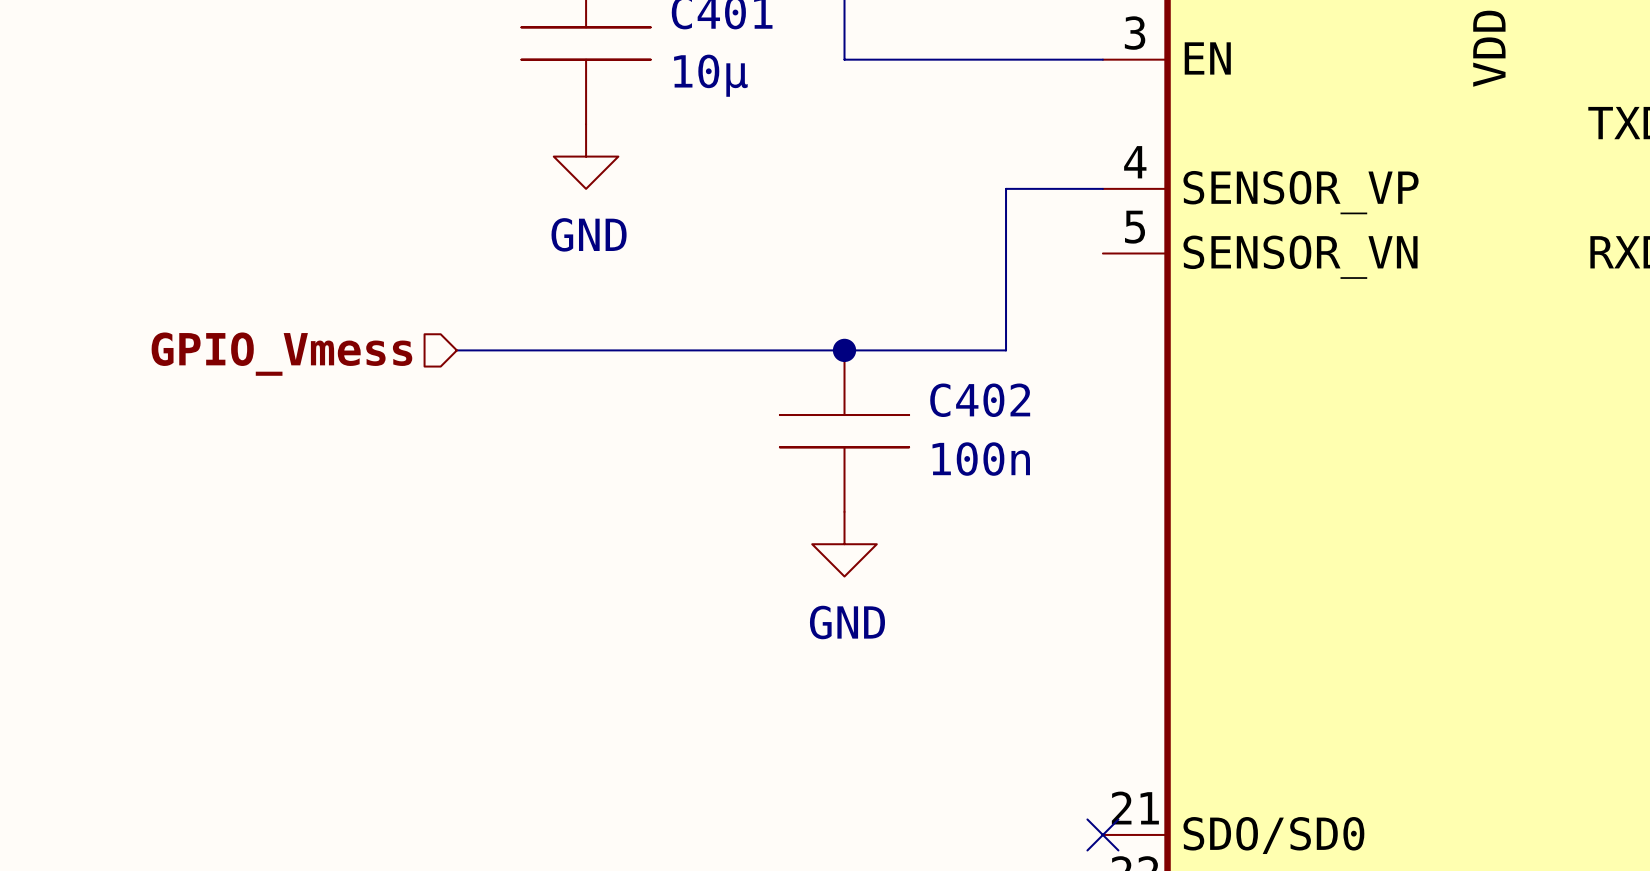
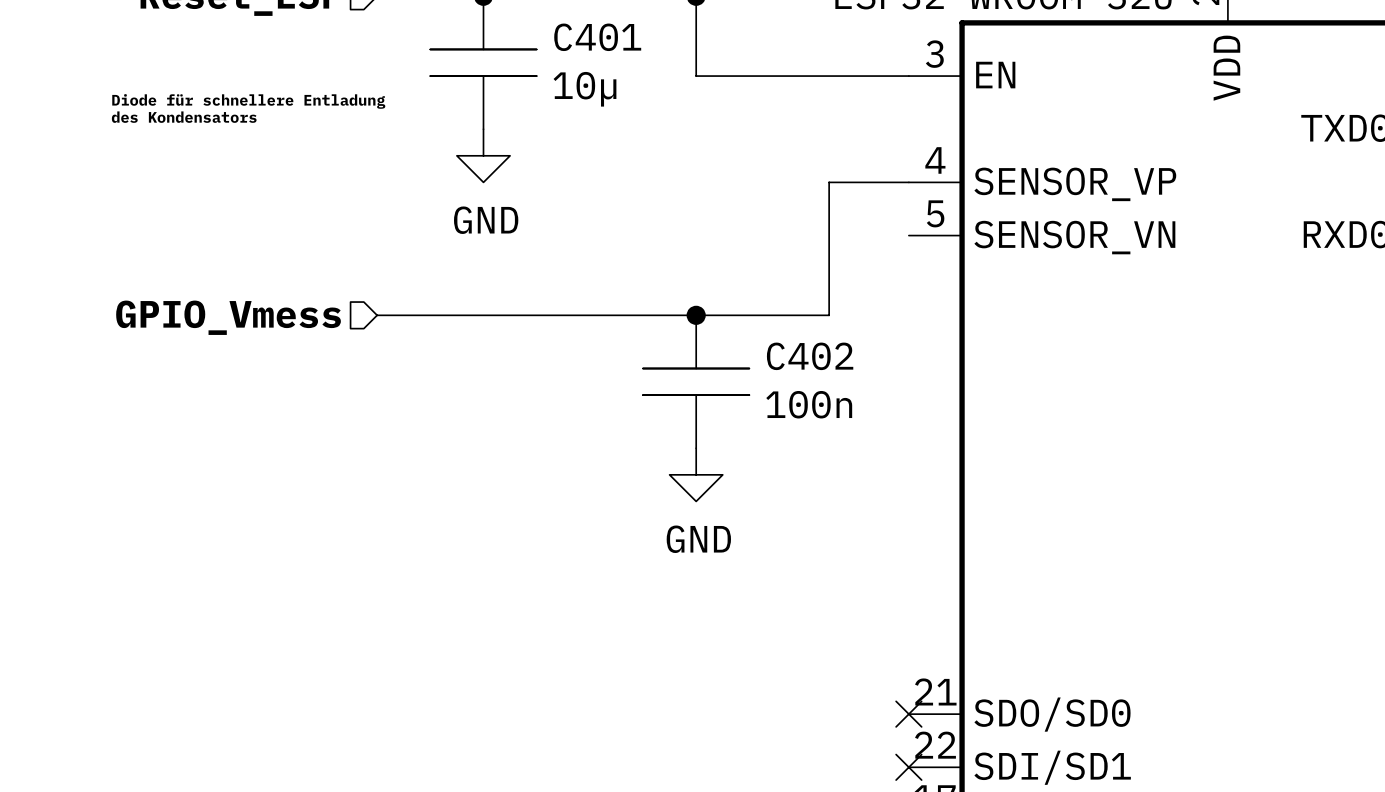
text: none -> Diode für schnellere Entladung (248, 101)
text: none -> des Kondensators (184, 117)

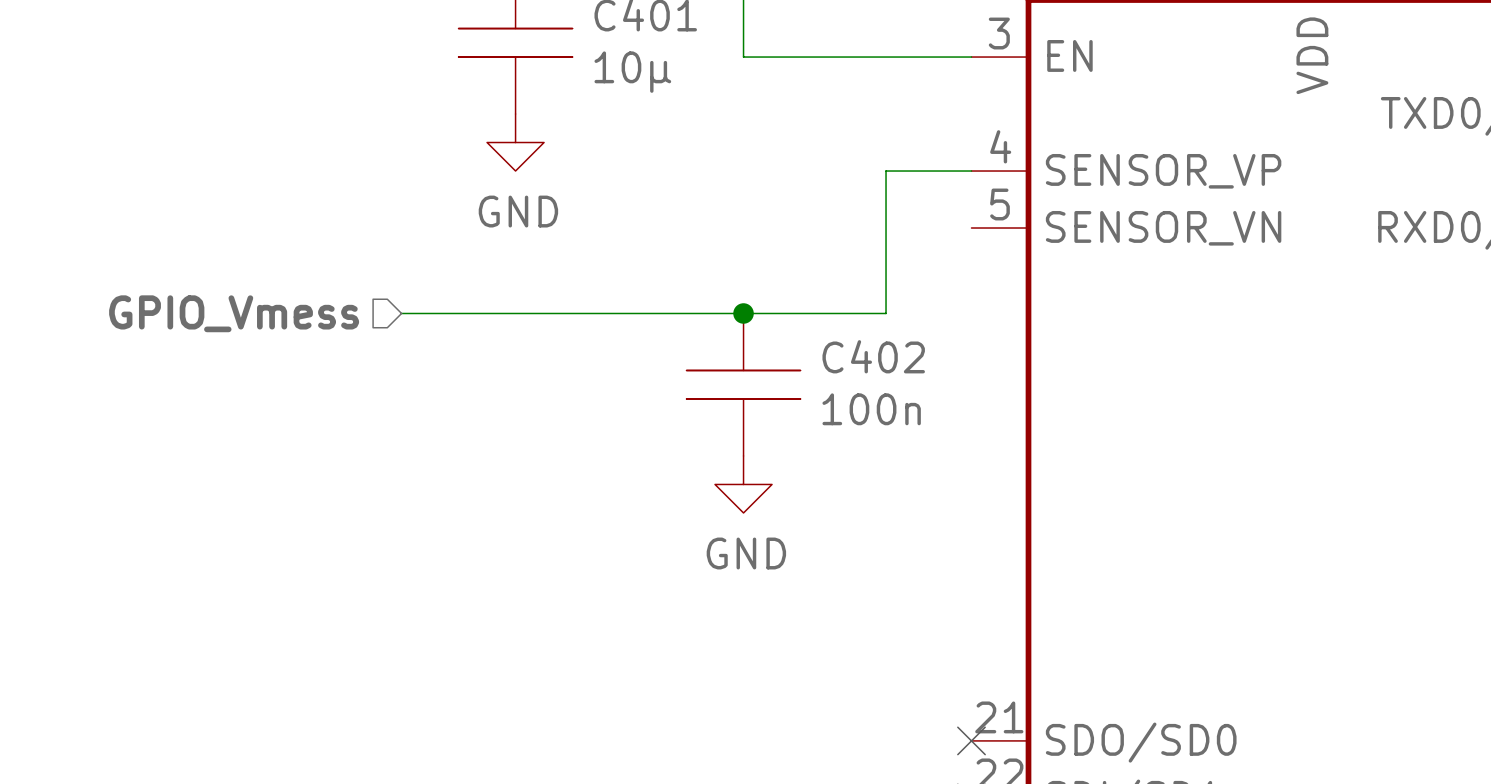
text: Diode für schnellere Entladung (248, 101) -> none
text: des Kondensators (184, 117) -> none

